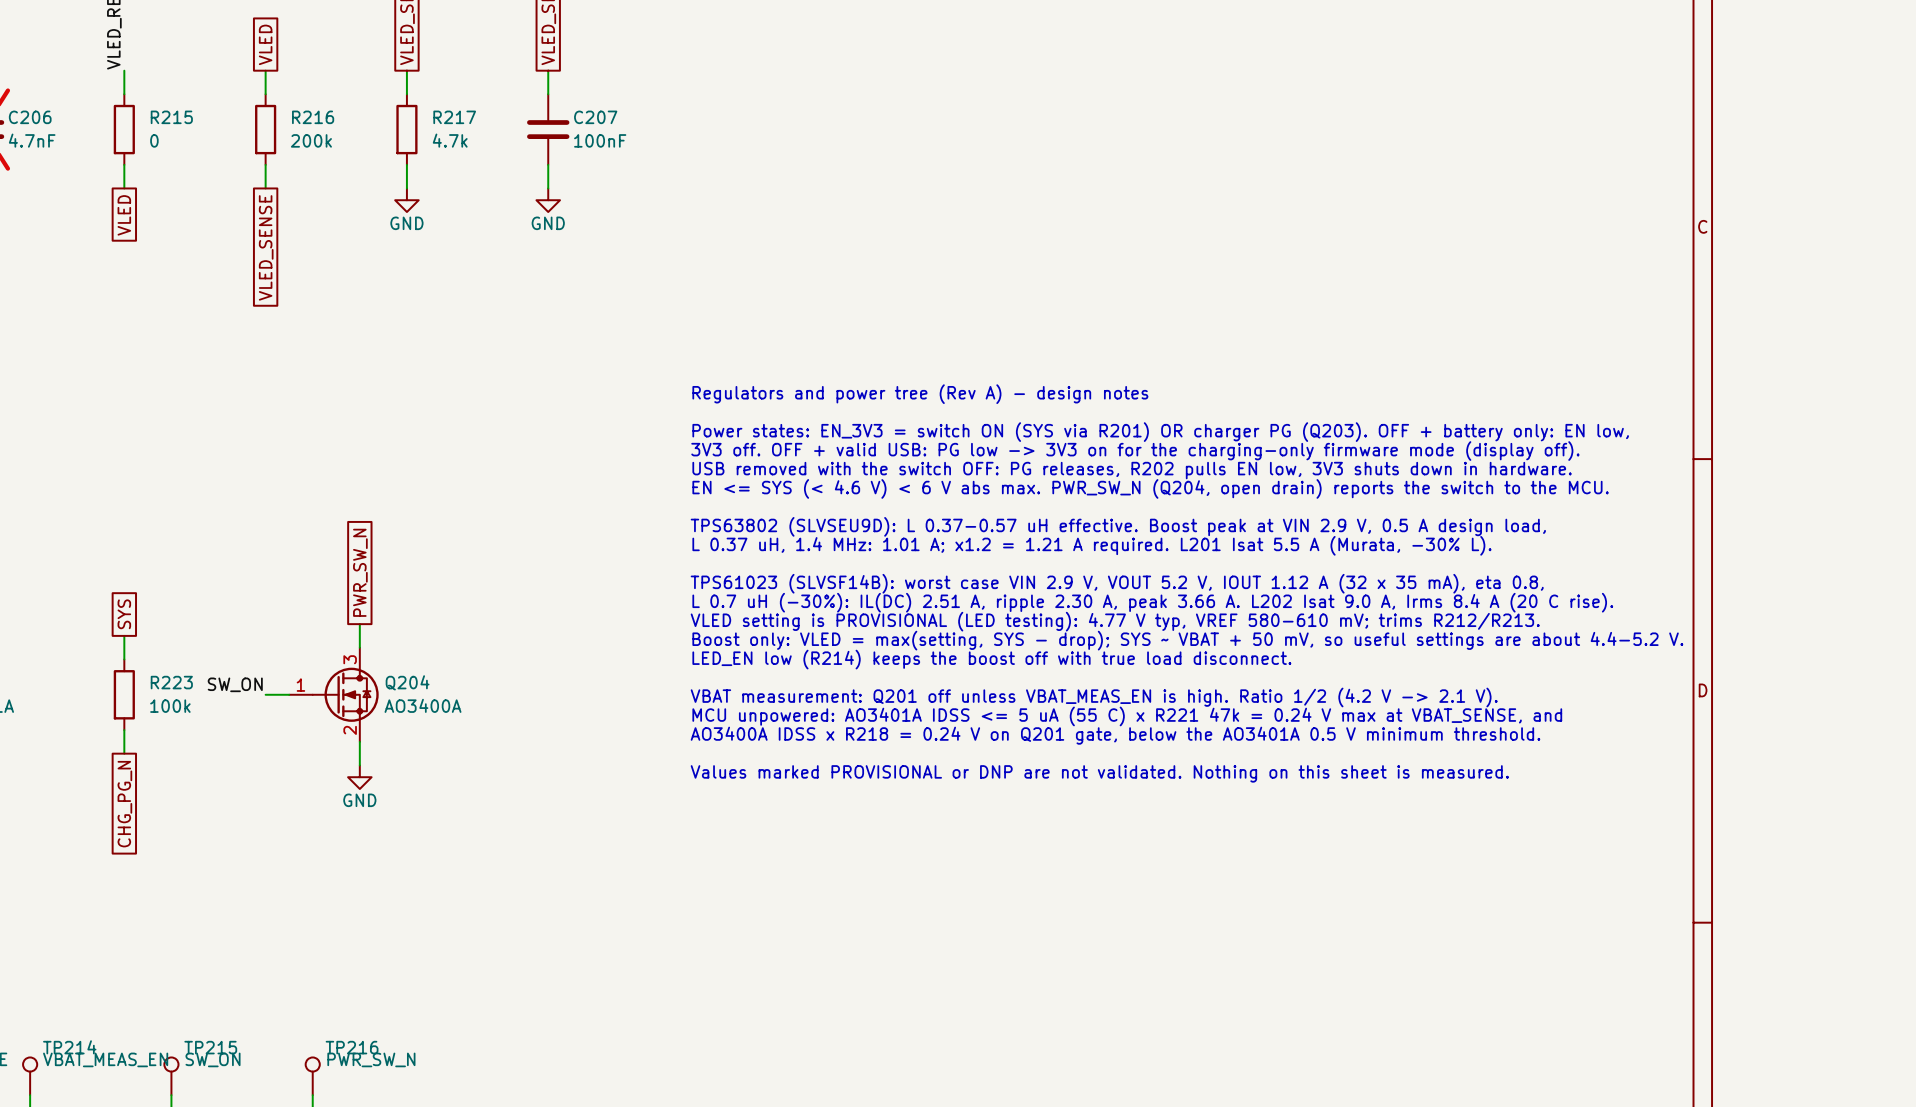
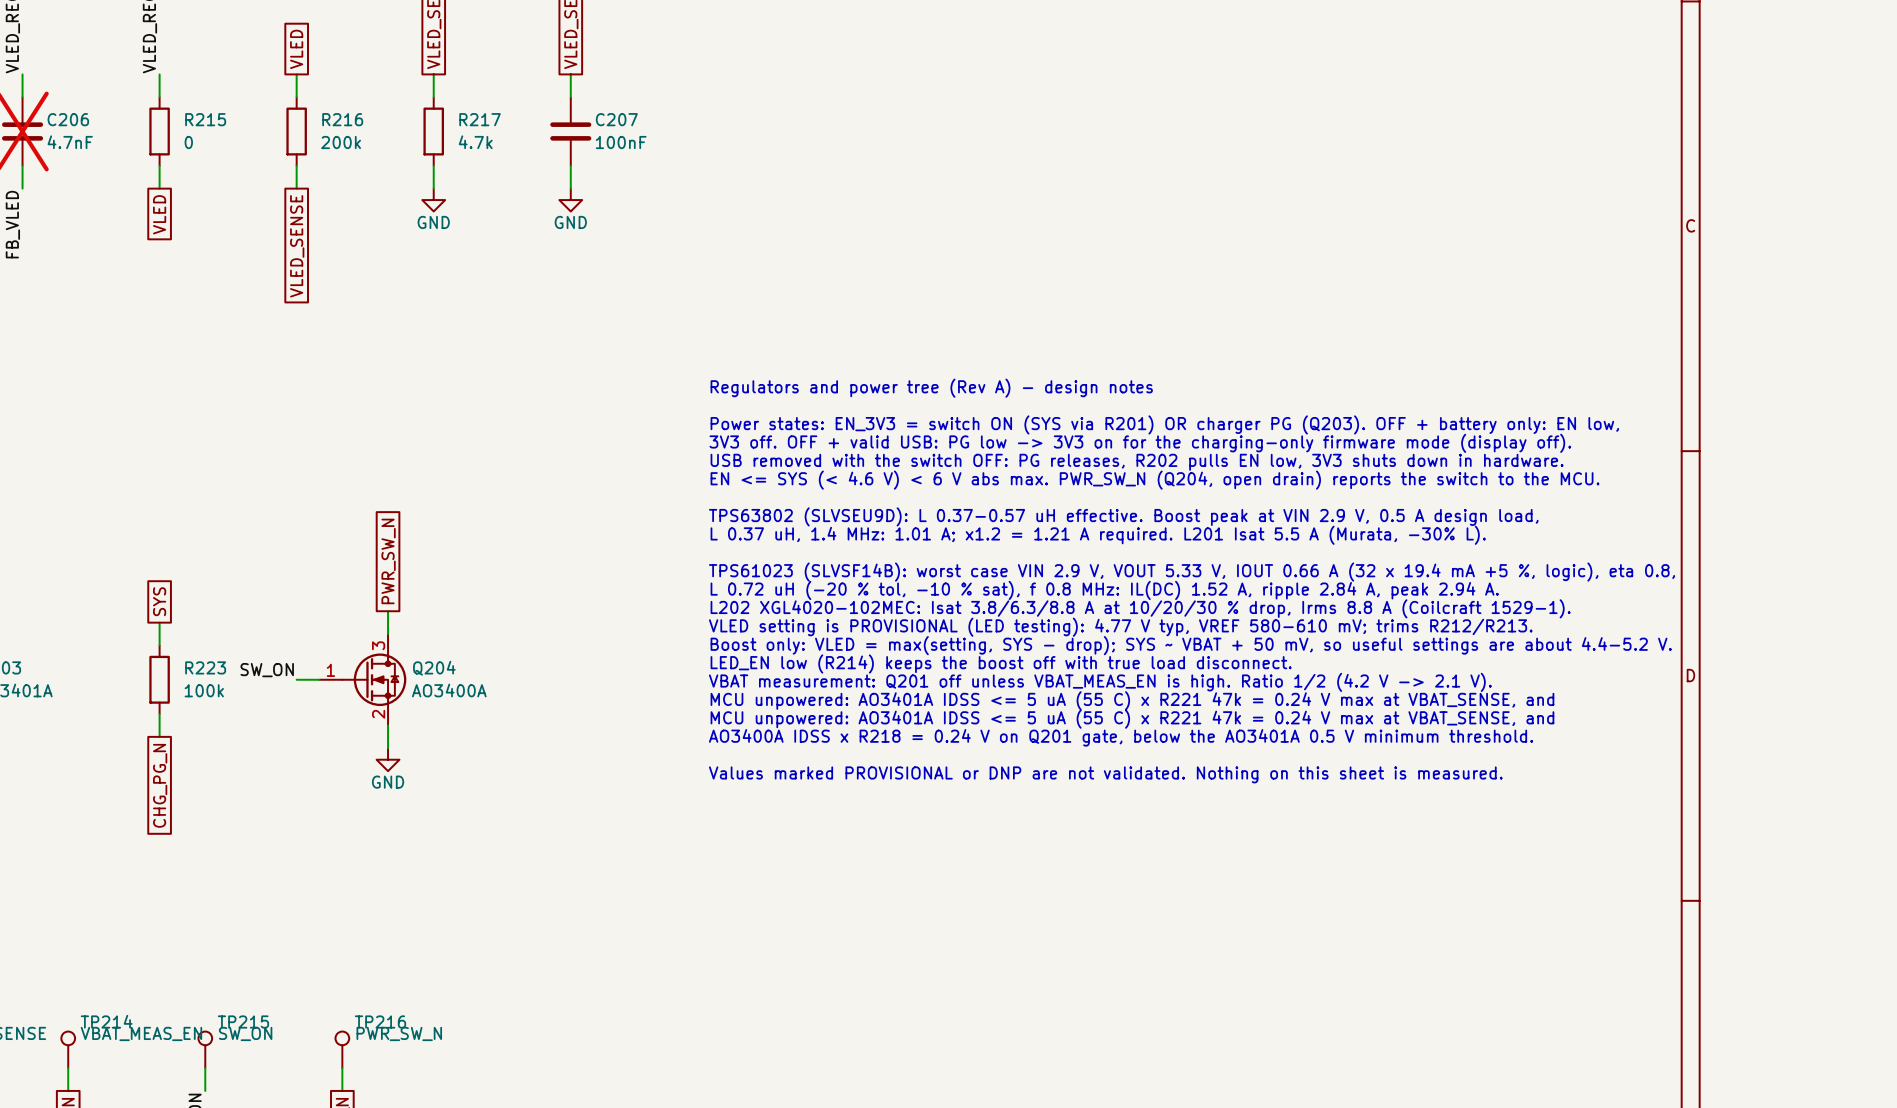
text: TPS61023 (SLVSF14B): worst case VIN 2.9 V, VOUT 5.2 V, IOUT 1.12 A (32 x 35 mA), eta 0.8, (1117, 583) -> TPS61023 (SLVSF14B): worst case VIN 2.9 V, VOUT 5.33 V, IOUT 0.66 A (32 x 19.4 mA +5 %, logic), eta 0.8, (1192, 572)
text: L 0.7 uH (-30%): IL(DC) 2.51 A, ripple 2.30 A, peak 3.66 A. L202 Isat 9.0 A, Irms 8.4 A (20 C rise). (1152, 602) -> L 0.72 uH (-20 % tol, -10 % sat), f 0.8 MHz: IL(DC) 1.52 A, ripple 2.84 A, peak 2.94 A. (1104, 590)
text: VLED setting is PROVISIONAL (LED testing): 4.77 V typ, VREF 580-610 mV; trims R212/R213. (1115, 621) -> L202 XGL4020-102MEC: Isat 3.8/6.3/8.8 A at 10/20/30 % drop, Irms 8.8 A (Coilcraft 1529-1). (1140, 608)
text: Boost only: VLED = max(setting, SYS - drop); SYS ~ VBAT + 50 mV, so useful settings are about 4.4-5.2 V. (1187, 640) -> VLED setting is PROVISIONAL (LED testing): 4.77 V typ, VREF 580-610 mV; trims R212/R213. (1120, 627)
text: LED_EN low (R214) keeps the boost off with true load disconnect. (991, 659) -> Boost only: VLED = max(setting, SYS - drop); SYS ~ VBAT + 50 mV, so useful settings are about 4.4-5.2 V. (1191, 645)
text: none -> LED_EN low (R214) keeps the boost off with true load disconnect. (1001, 664)
text: AO3400A IDSS x R218 = 0.24 V on Q201 gate, below the AO3401A 0.5 V minimum threshold. (1115, 735) -> MCU unpowered: AO3401A IDSS <= 5 uA (55 C) x R221 47k = 0.24 V max at VBAT_SENSE, and (1132, 719)
text: none -> AO3400A IDSS x R218 = 0.24 V on Q201 gate, below the AO3401A 0.5 V minimum threshold. (1121, 737)
text position: Values marked PROVISIONAL or DNP are not validated. Nothing on this sheet is measured. (1099, 773) -> Values marked PROVISIONAL or DNP are not validated. Nothing on this sheet is measured. (1105, 774)

